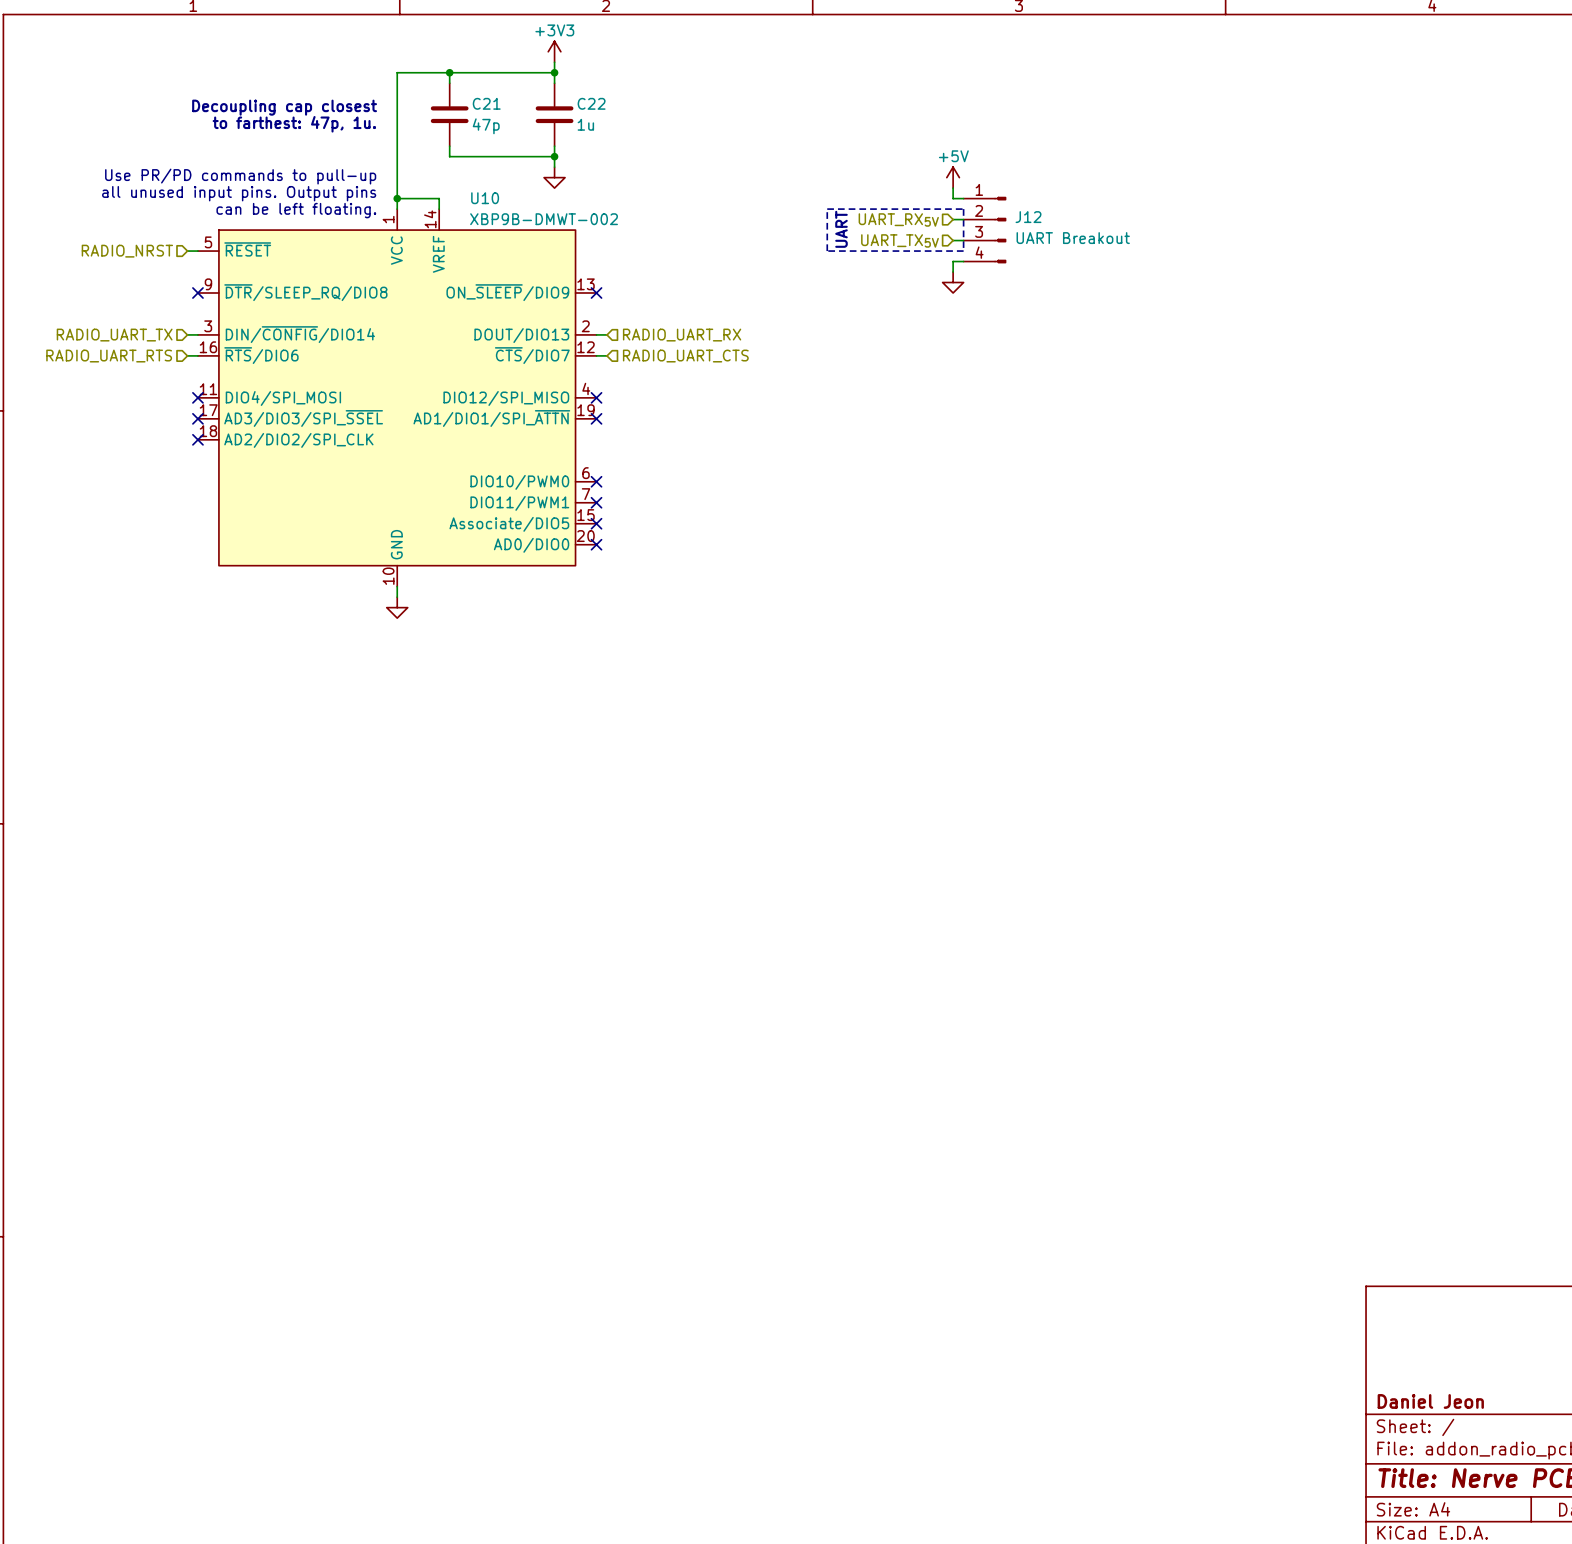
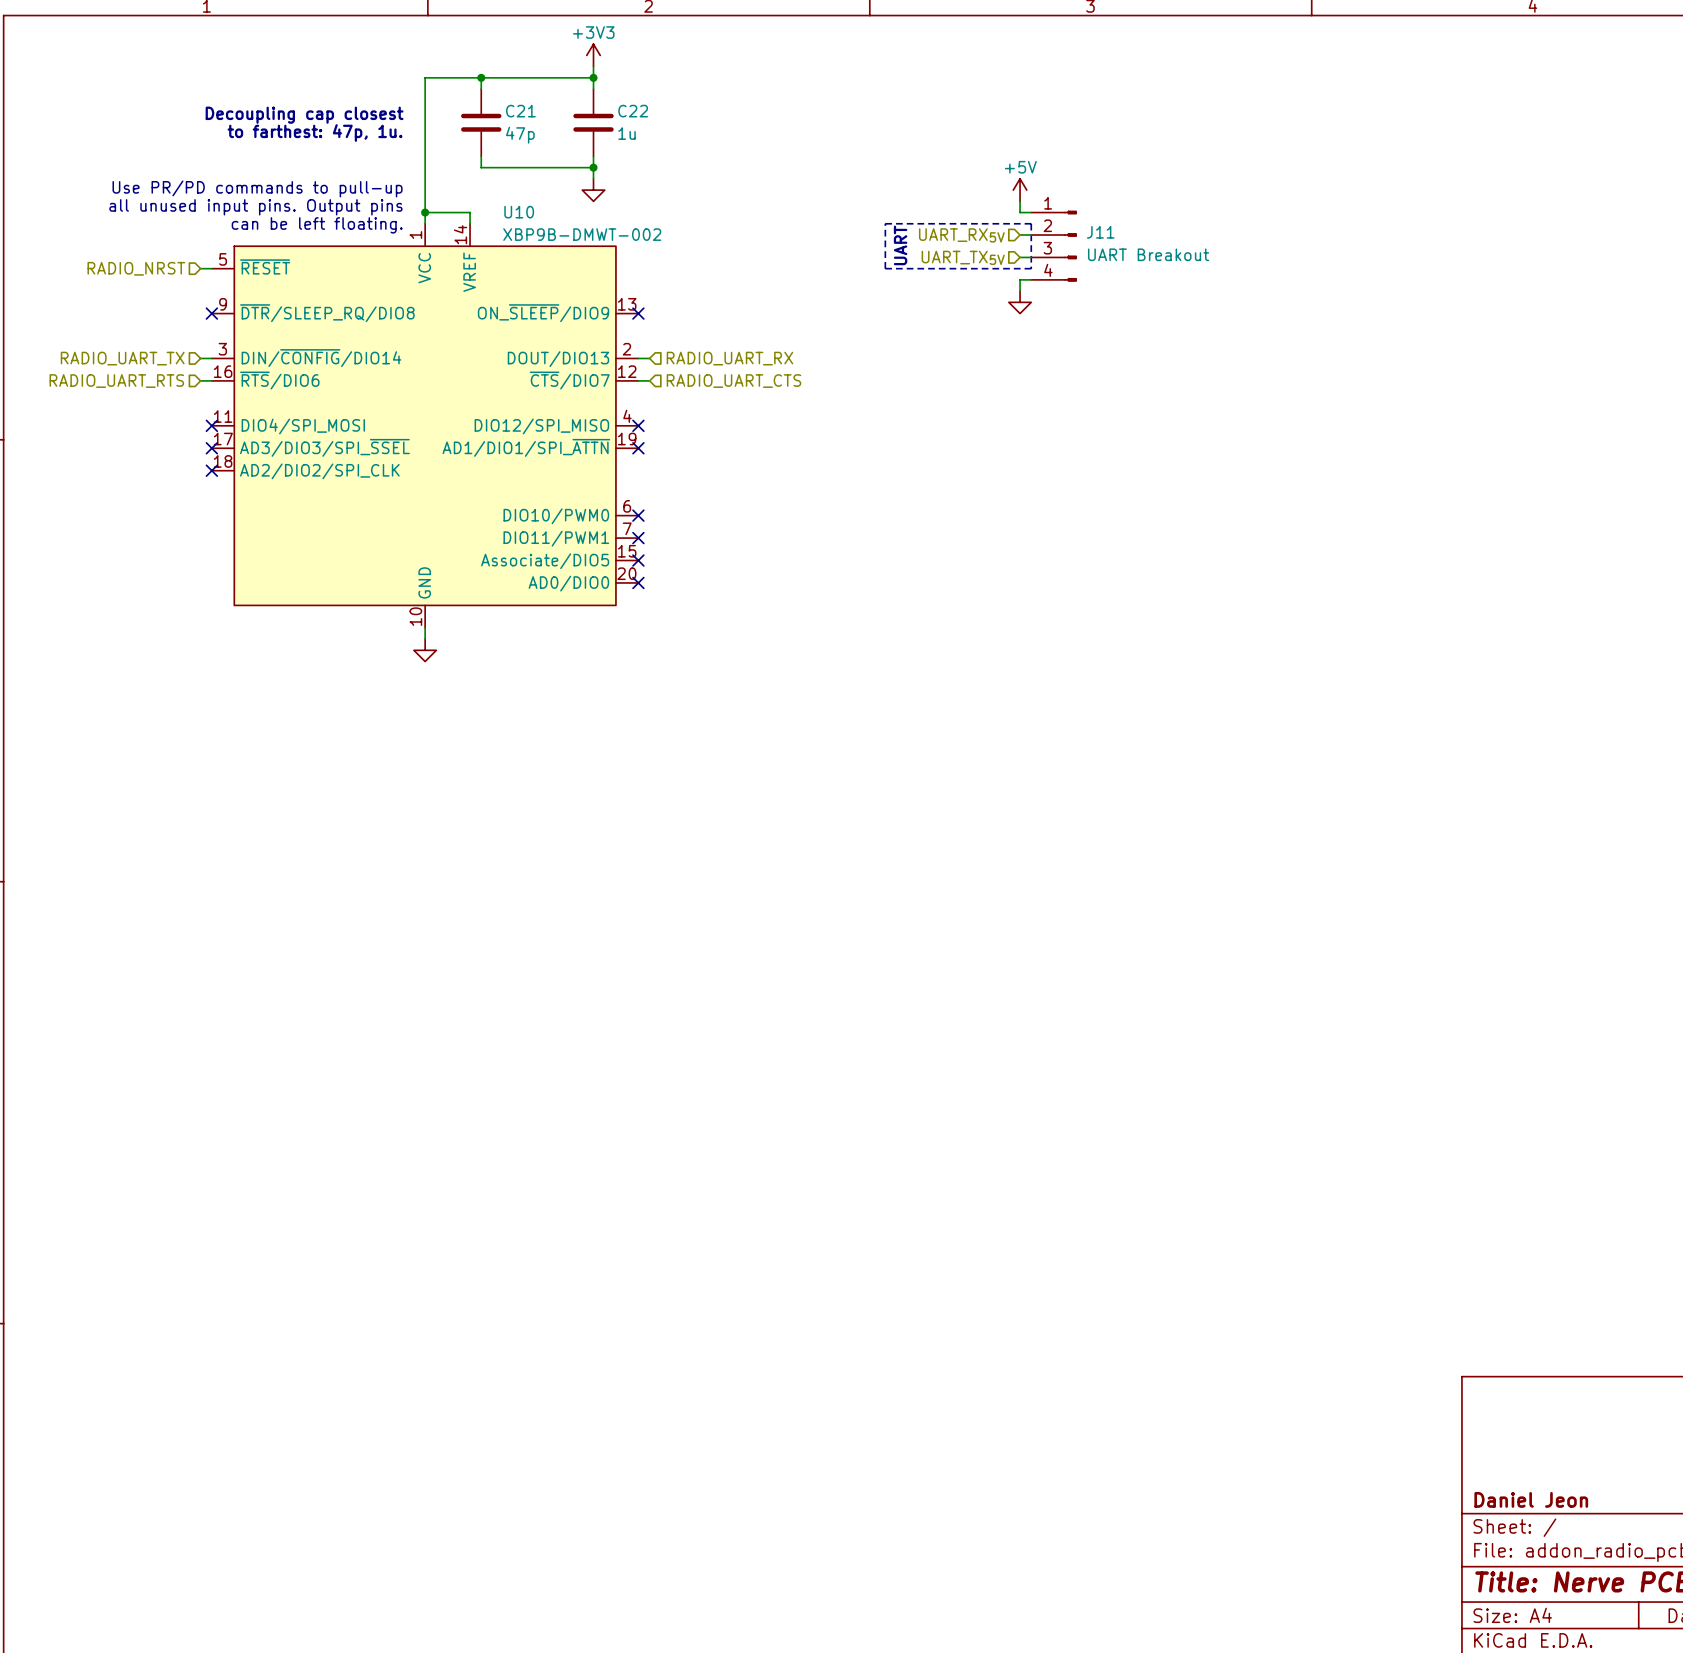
J12 name: J12 (1028, 217) -> J11 (1100, 232)

